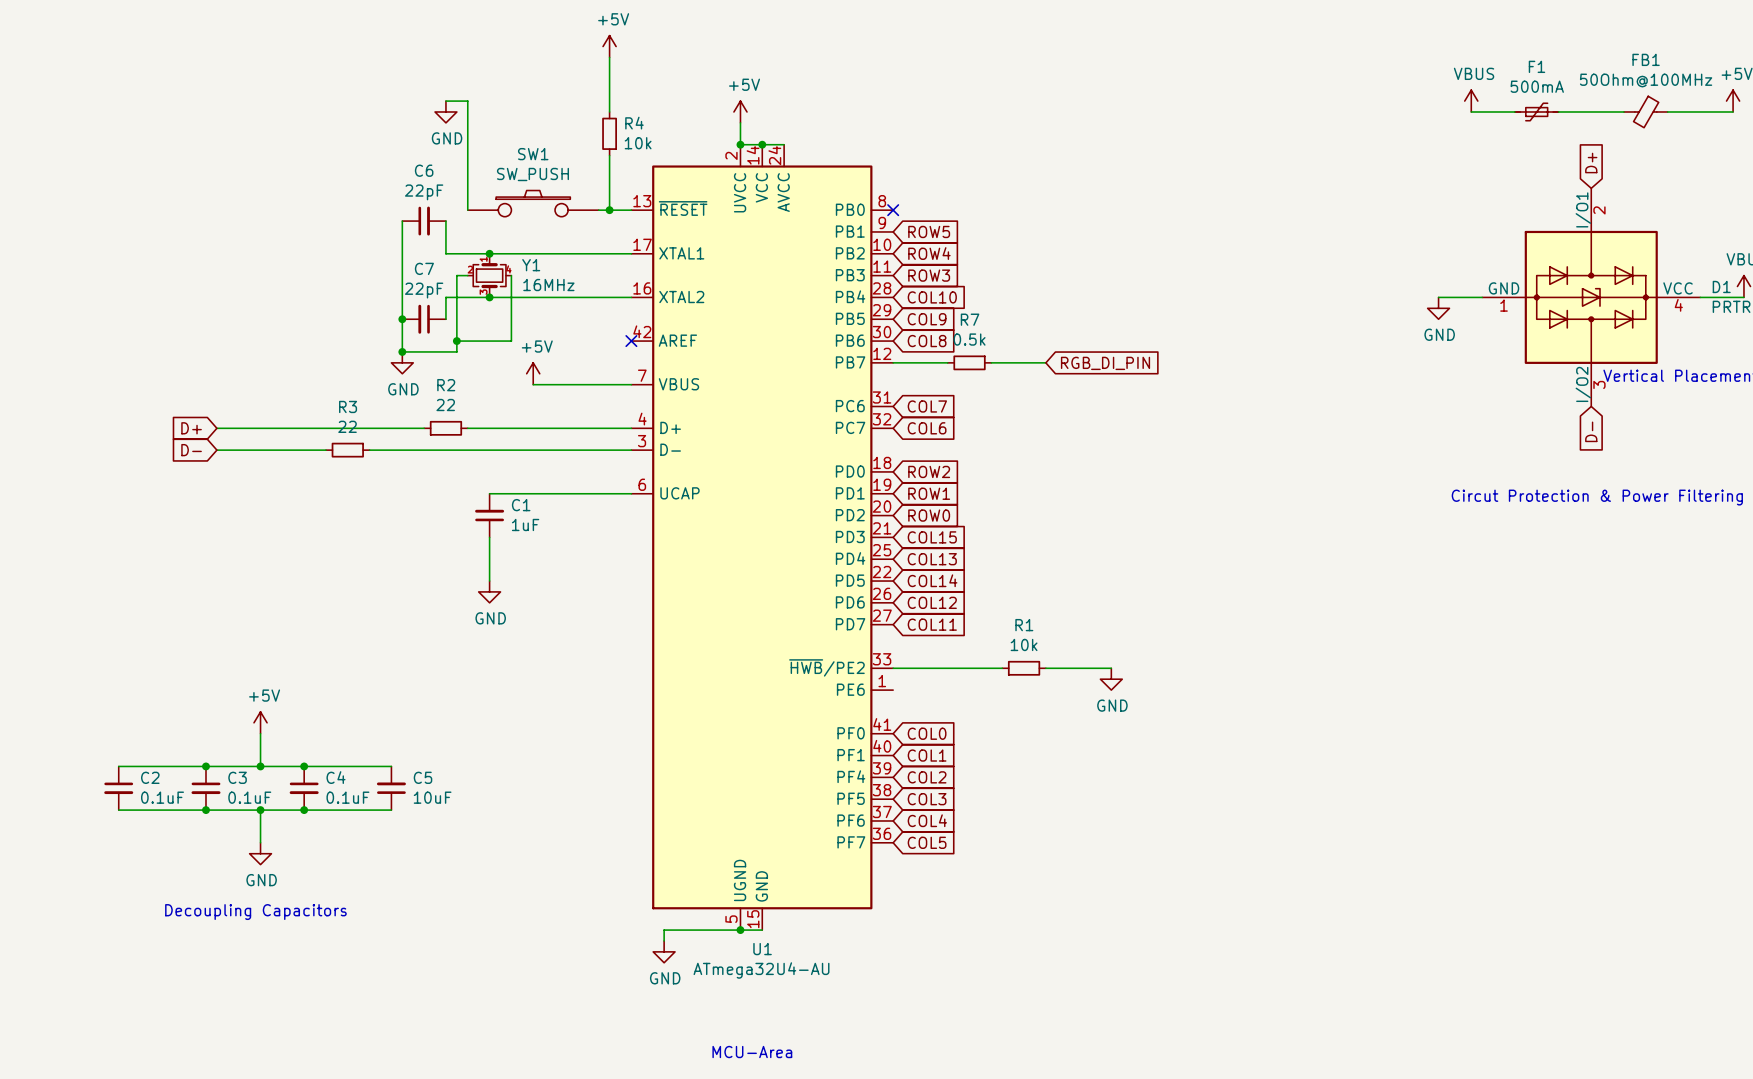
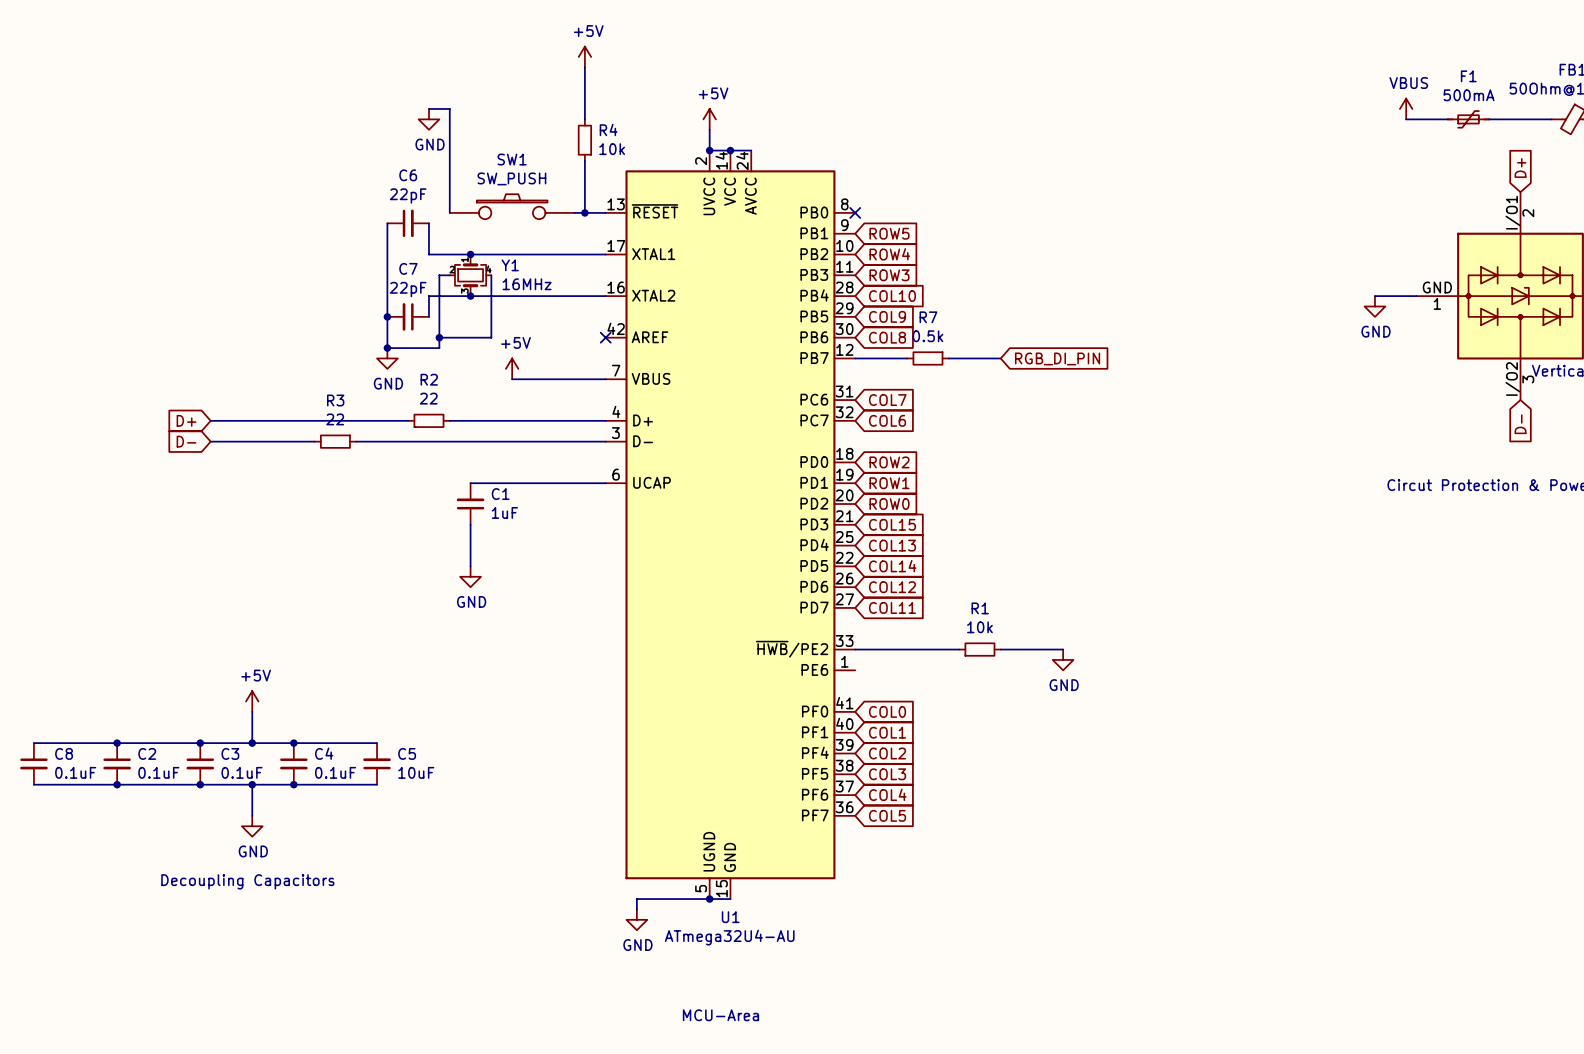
wire: none -> (33, 743) (117, 743)
junction: none -> (117, 743)
C8: none -> 0.1uF (33, 763)
wire: none -> (33, 784) (117, 784)
junction: none -> (117, 784)

